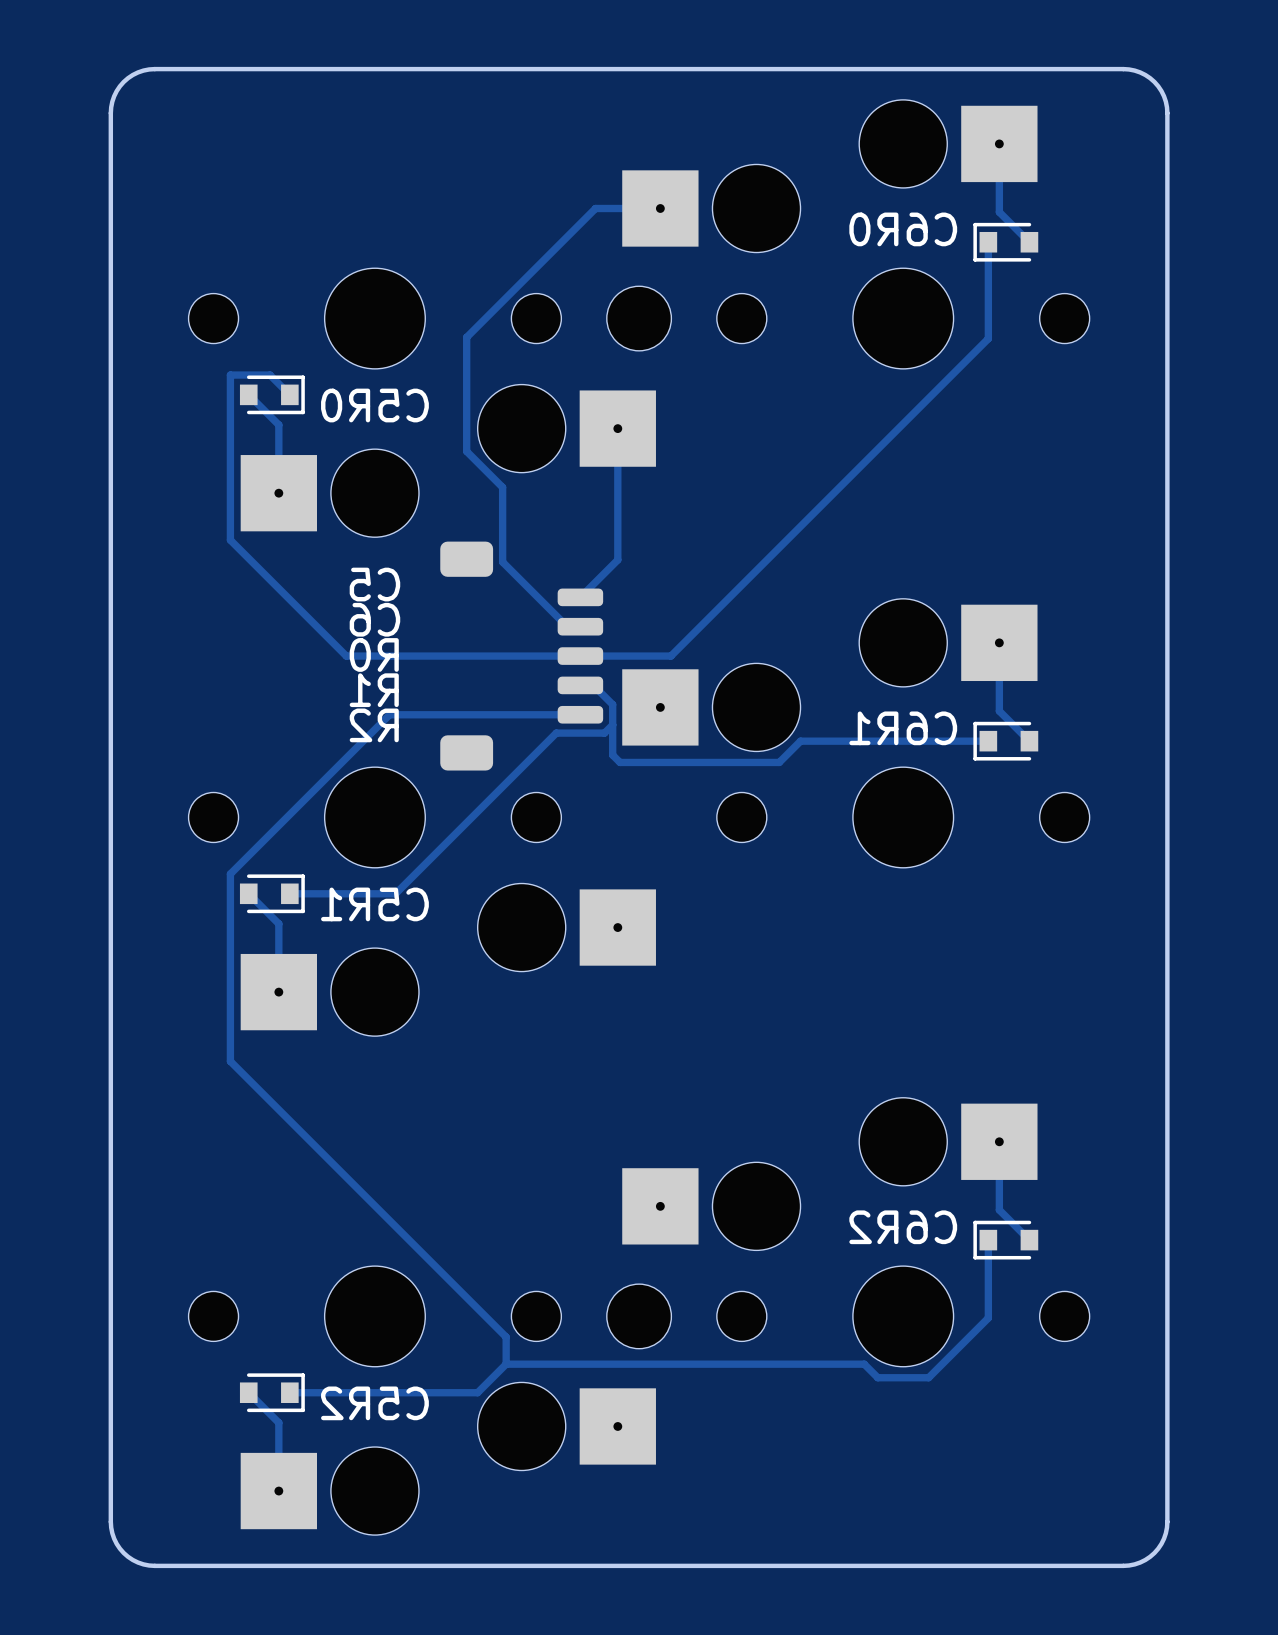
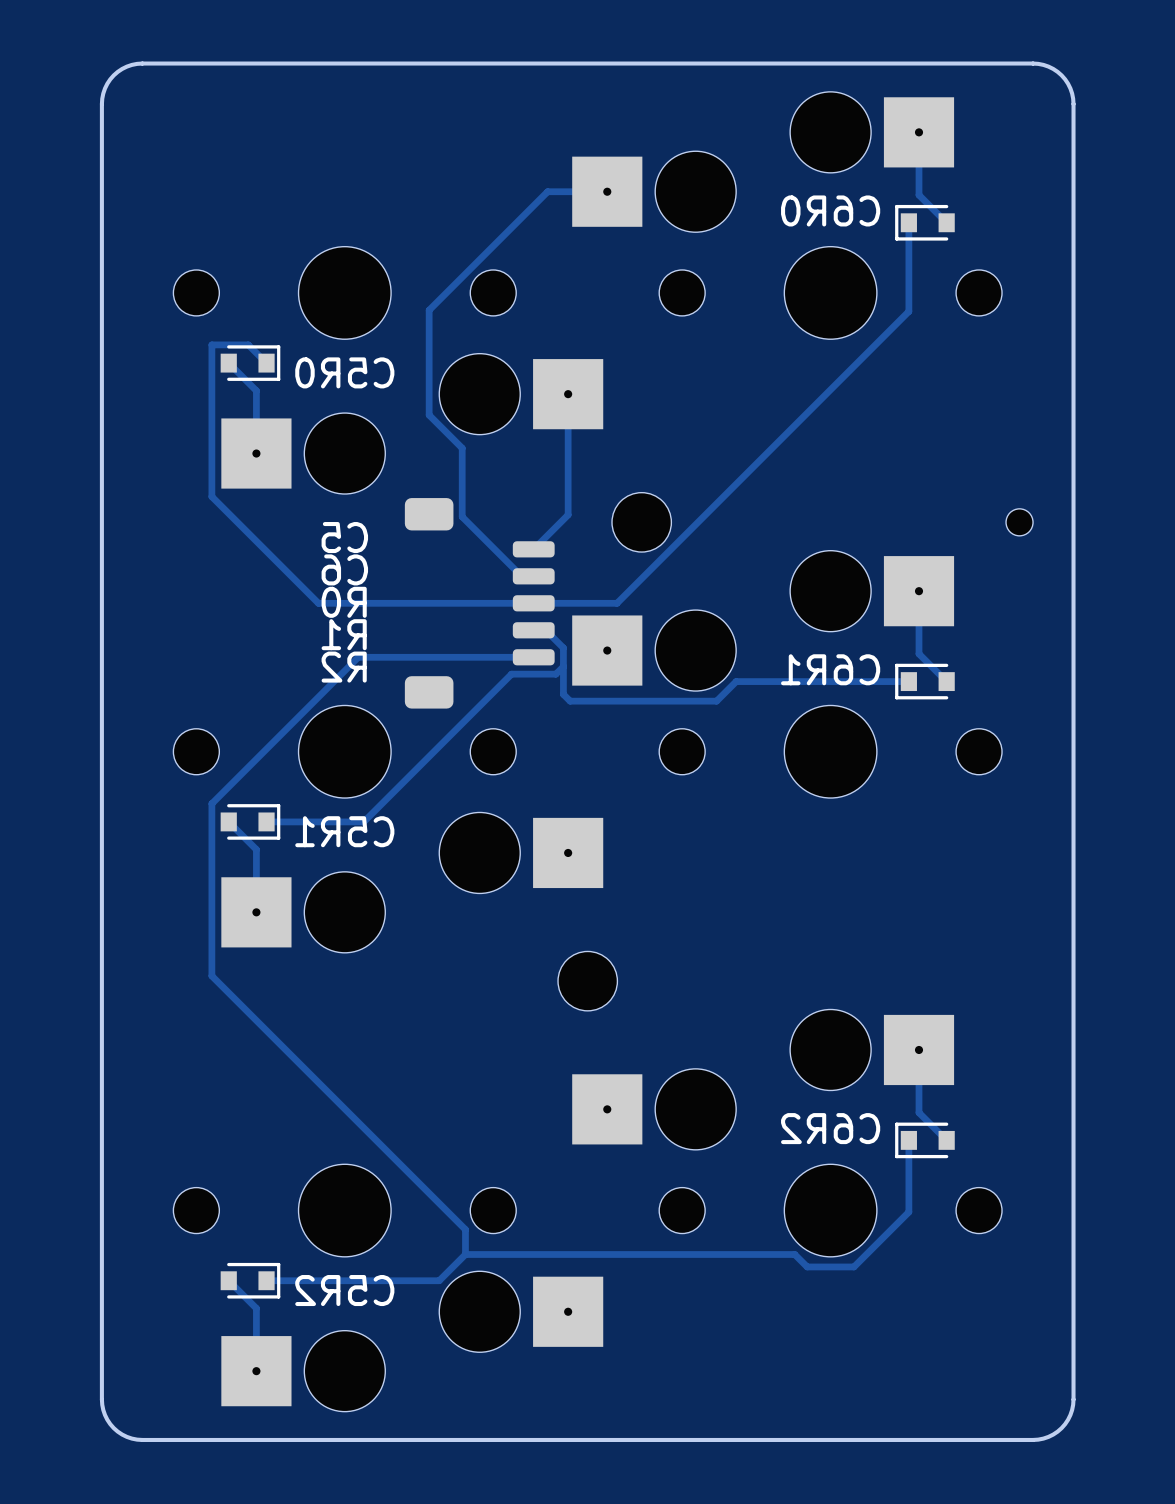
part position: (639, 318) -> (641, 522)
part: none -> (1019, 522)
part position: (639, 1316) -> (587, 981)

